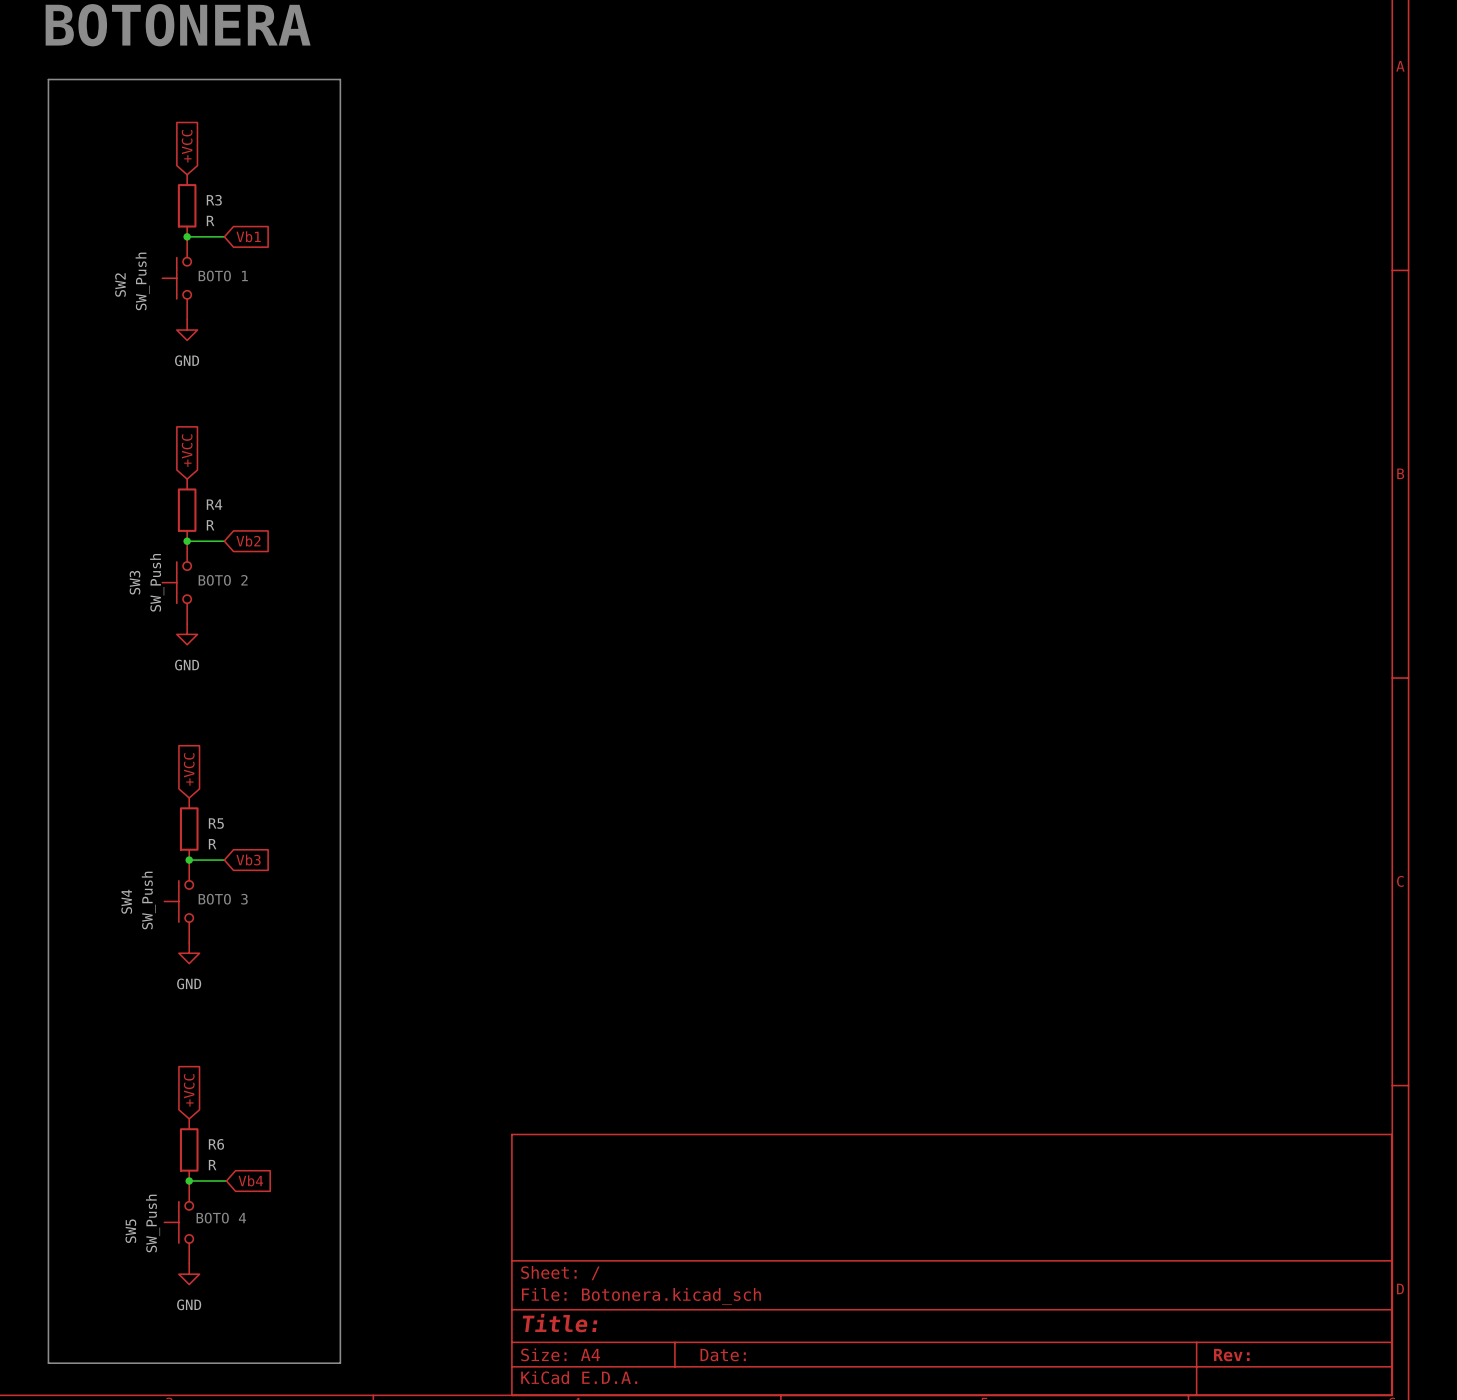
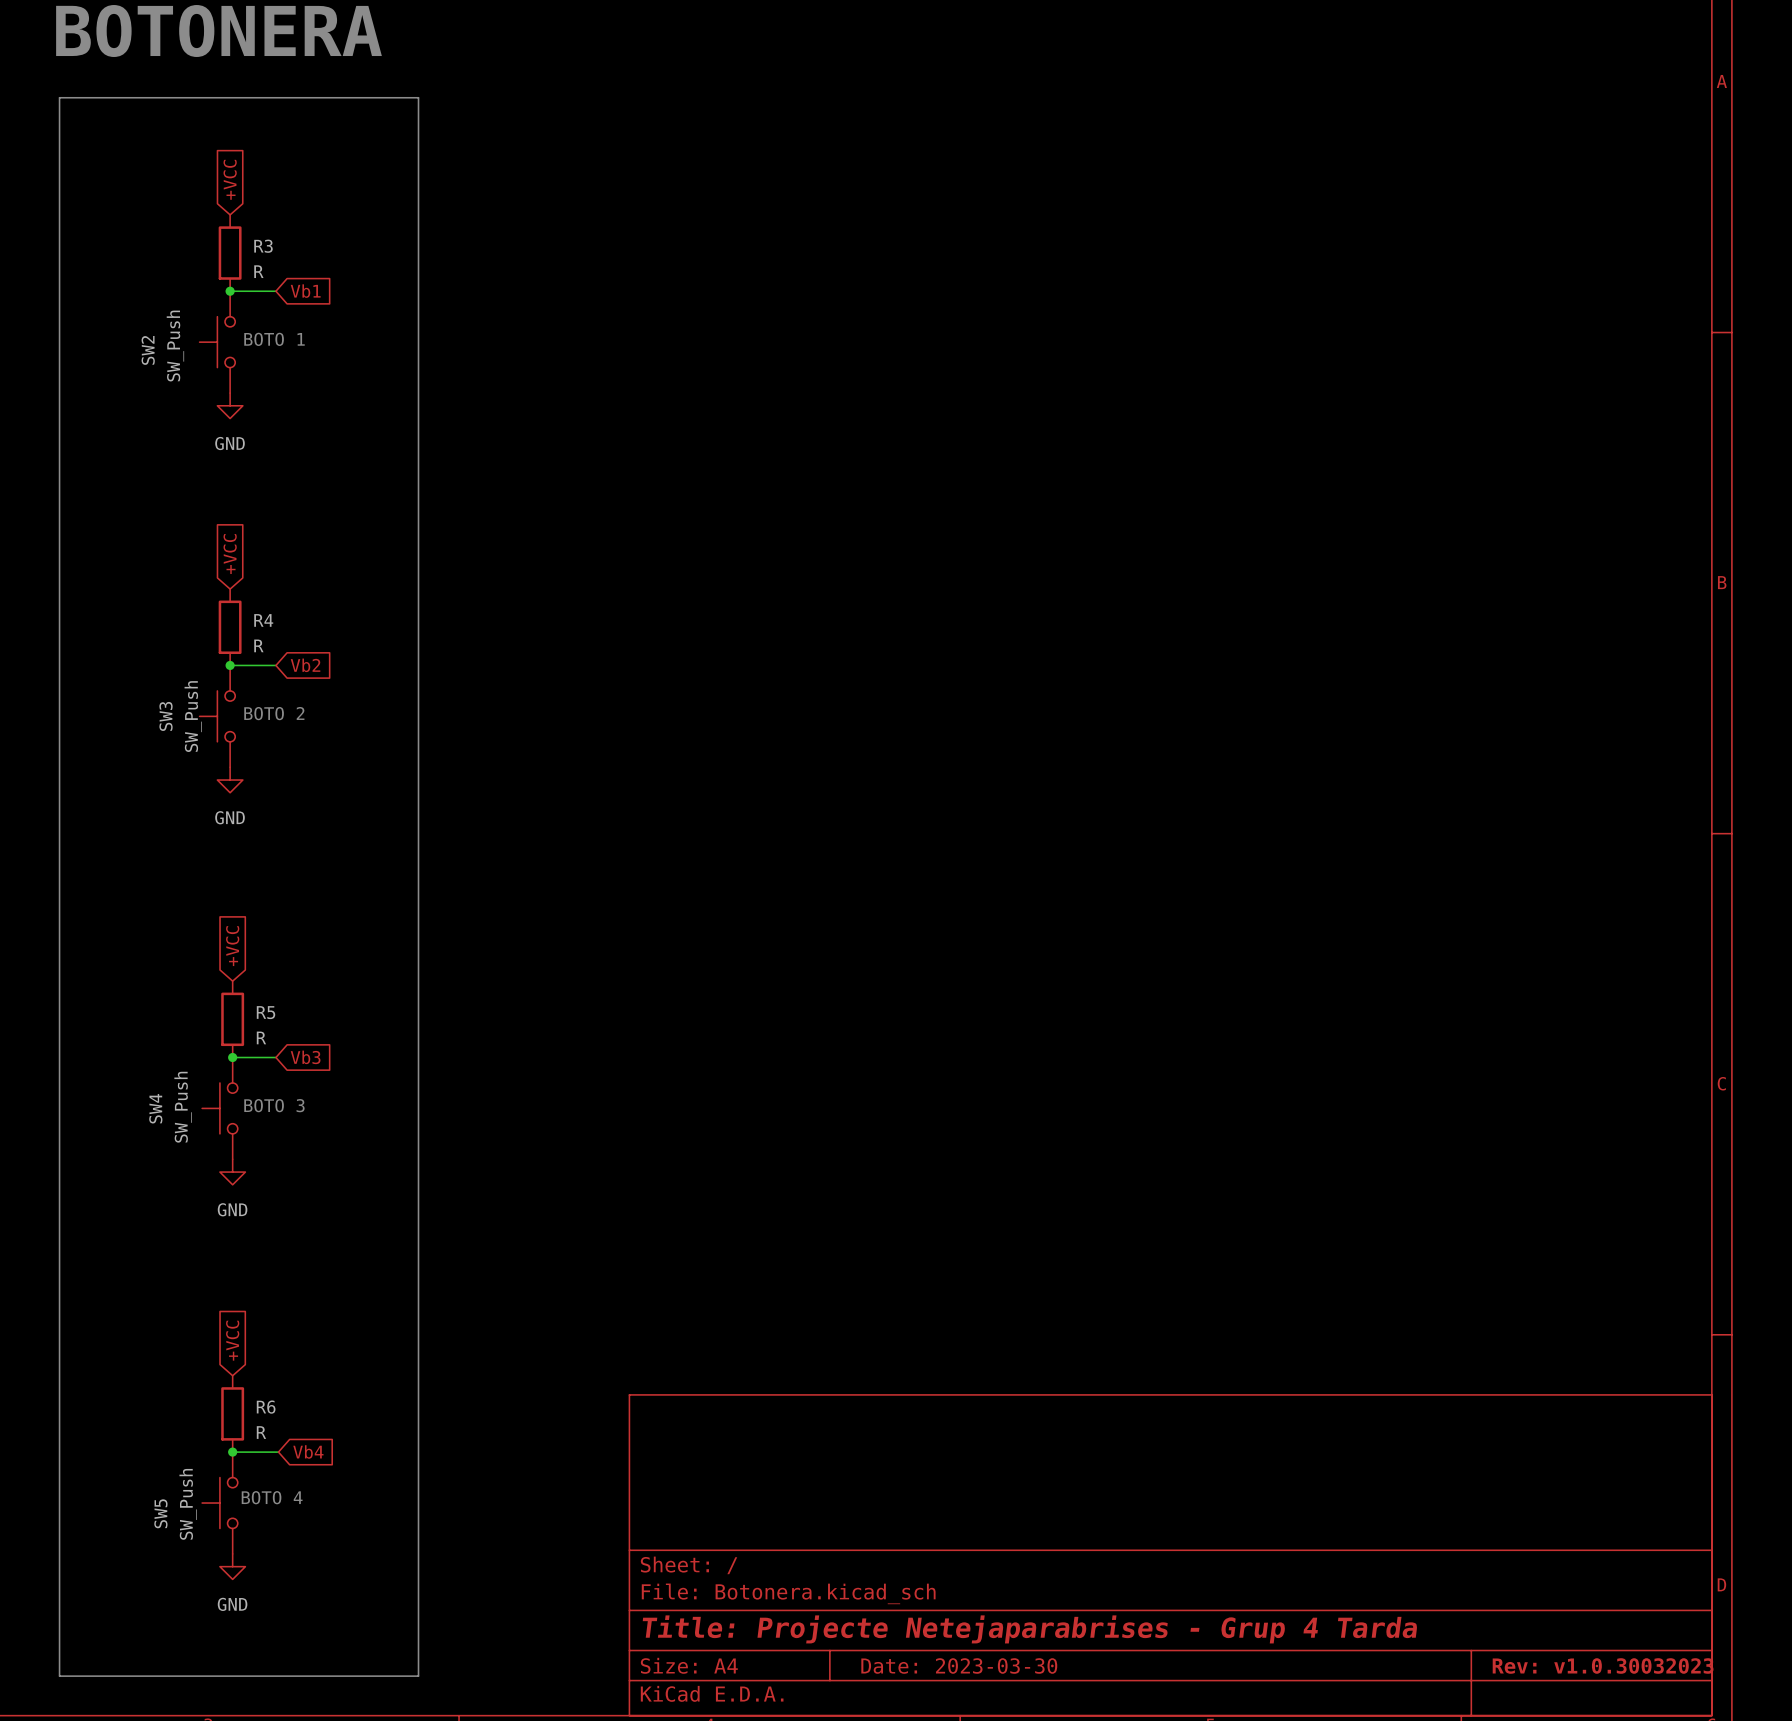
title block: Title: (560, 1323) -> Title: Projecte Netejaparabrises - Grup 4 Tarda (1030, 1629)
title block: Date: (723, 1355) -> Date: 2023-03-30 (959, 1665)
title block: Rev: (1231, 1355) -> Rev: v1.0.30032023 (1603, 1665)

